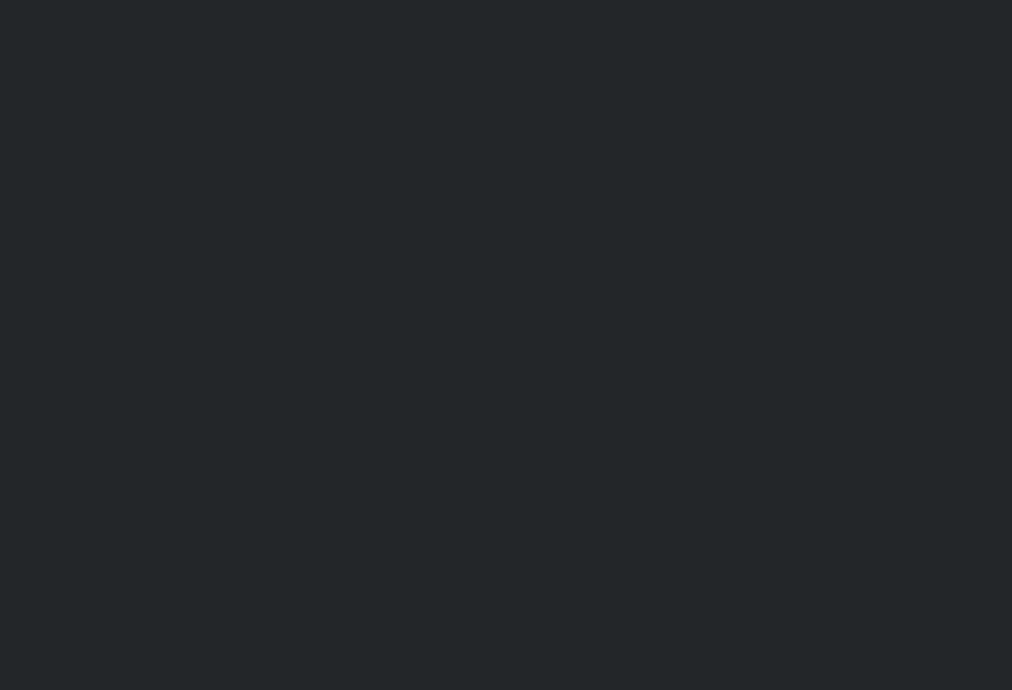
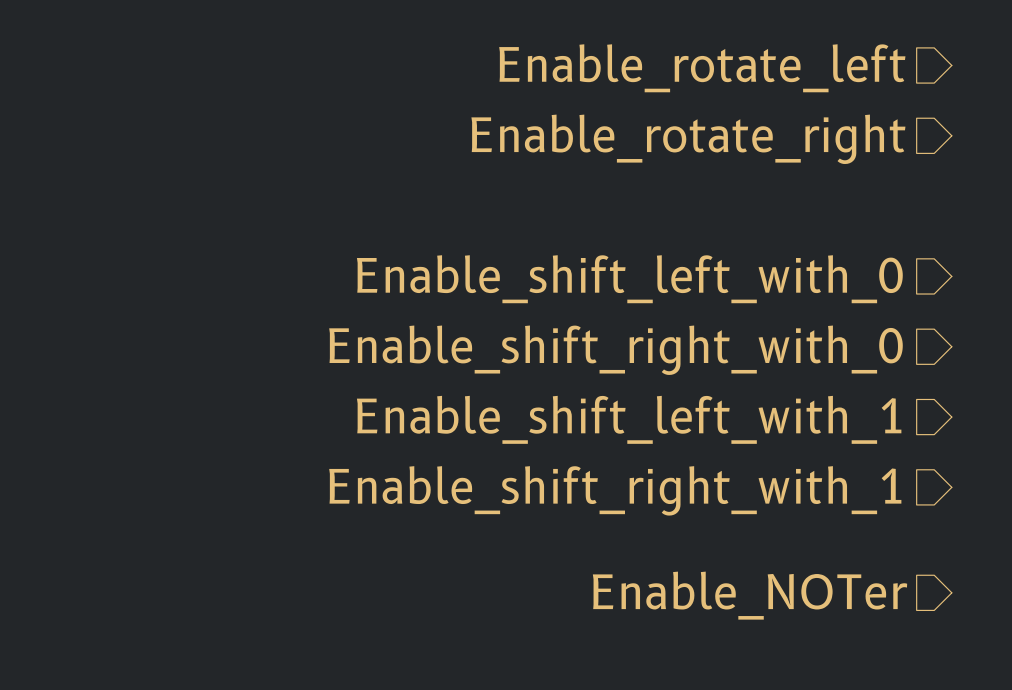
hierarchical label: none -> Enable_rotate_left (702, 68)
hierarchical label: none -> Enable_rotate_right (688, 139)
hierarchical label: none -> Enable_shift_left_with_0 (629, 279)
hierarchical label: none -> Enable_shift_right_with_0 (615, 350)
hierarchical label: none -> Enable_shift_left_with_1 (629, 419)
hierarchical label: none -> Enable_shift_right_with_1 (615, 490)
hierarchical label: none -> Enable_NOTer (750, 595)

